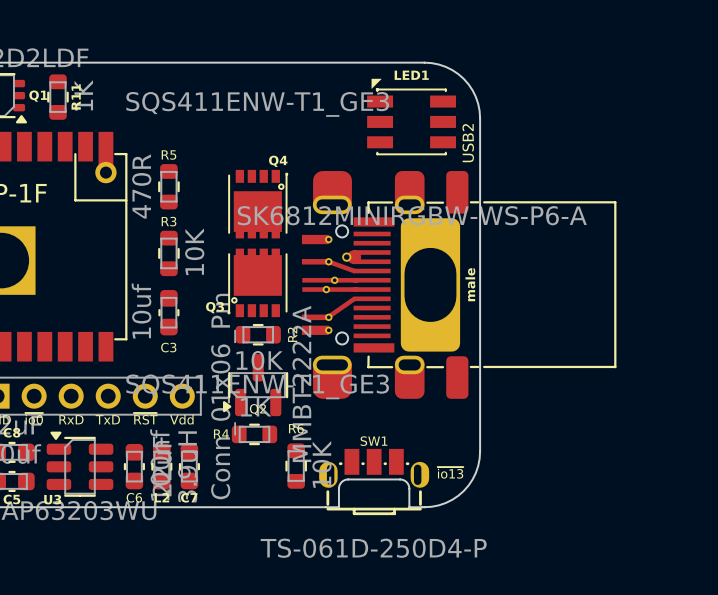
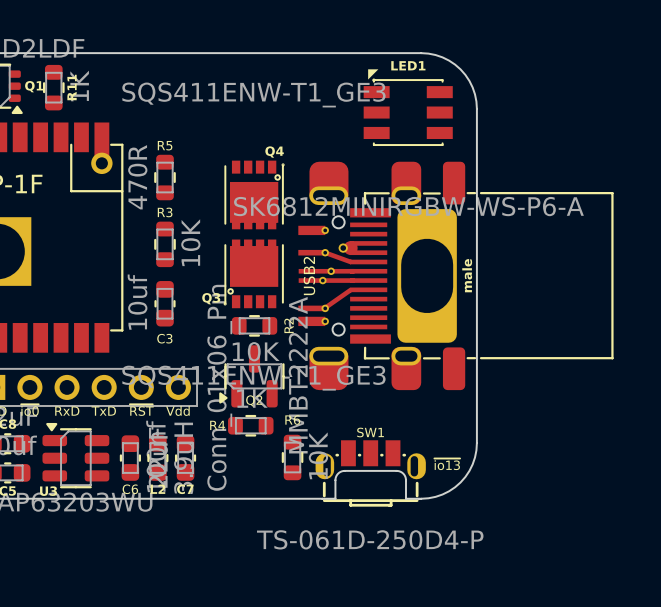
USB2 name position: USB2 (468, 143) -> USB2 (309, 276)

